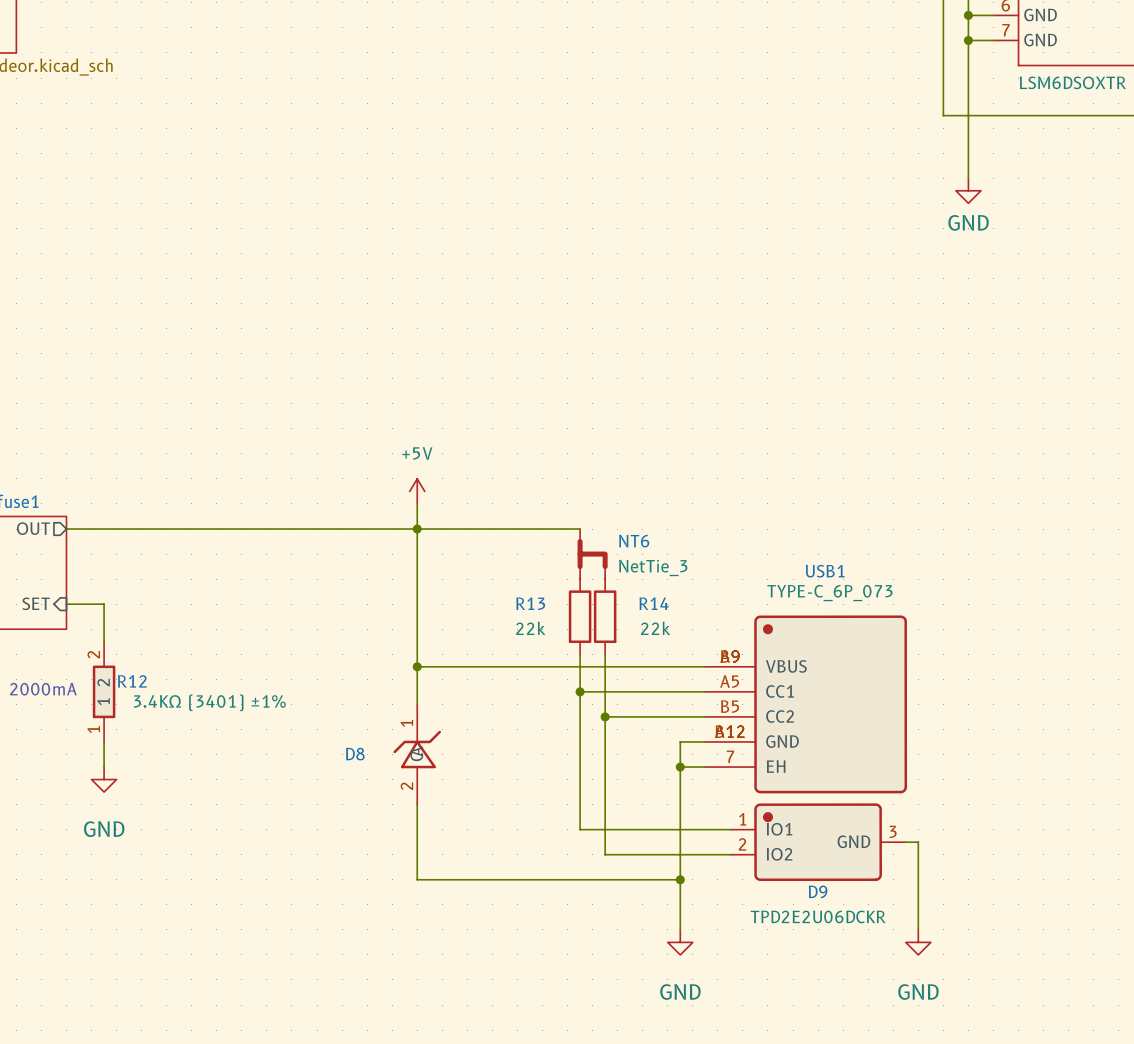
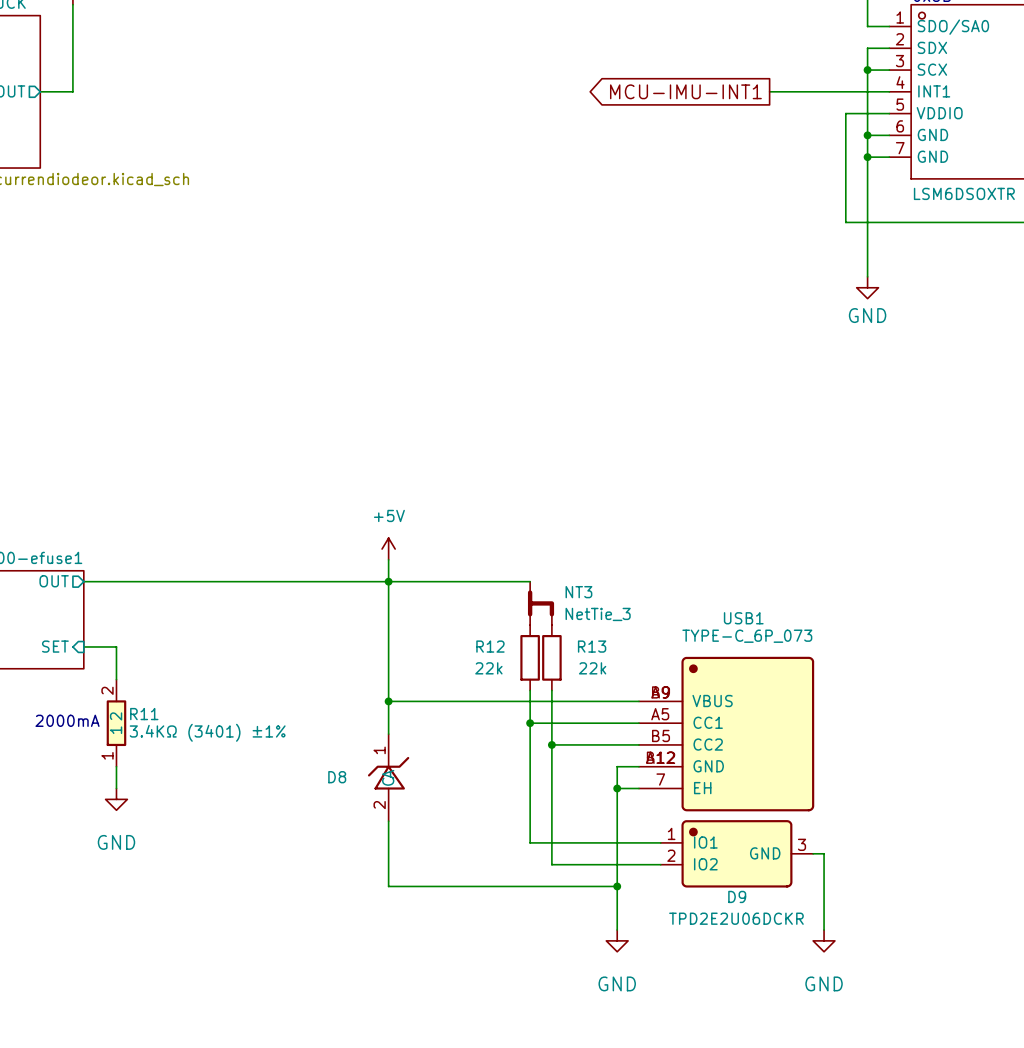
NT6 name: NT6 (634, 541) -> NT3 (578, 592)
R13 name: R13 (530, 603) -> R12 (490, 646)
R14 name: R14 (654, 603) -> R13 (592, 646)
R12 name: R12 (132, 681) -> R11 (144, 714)

